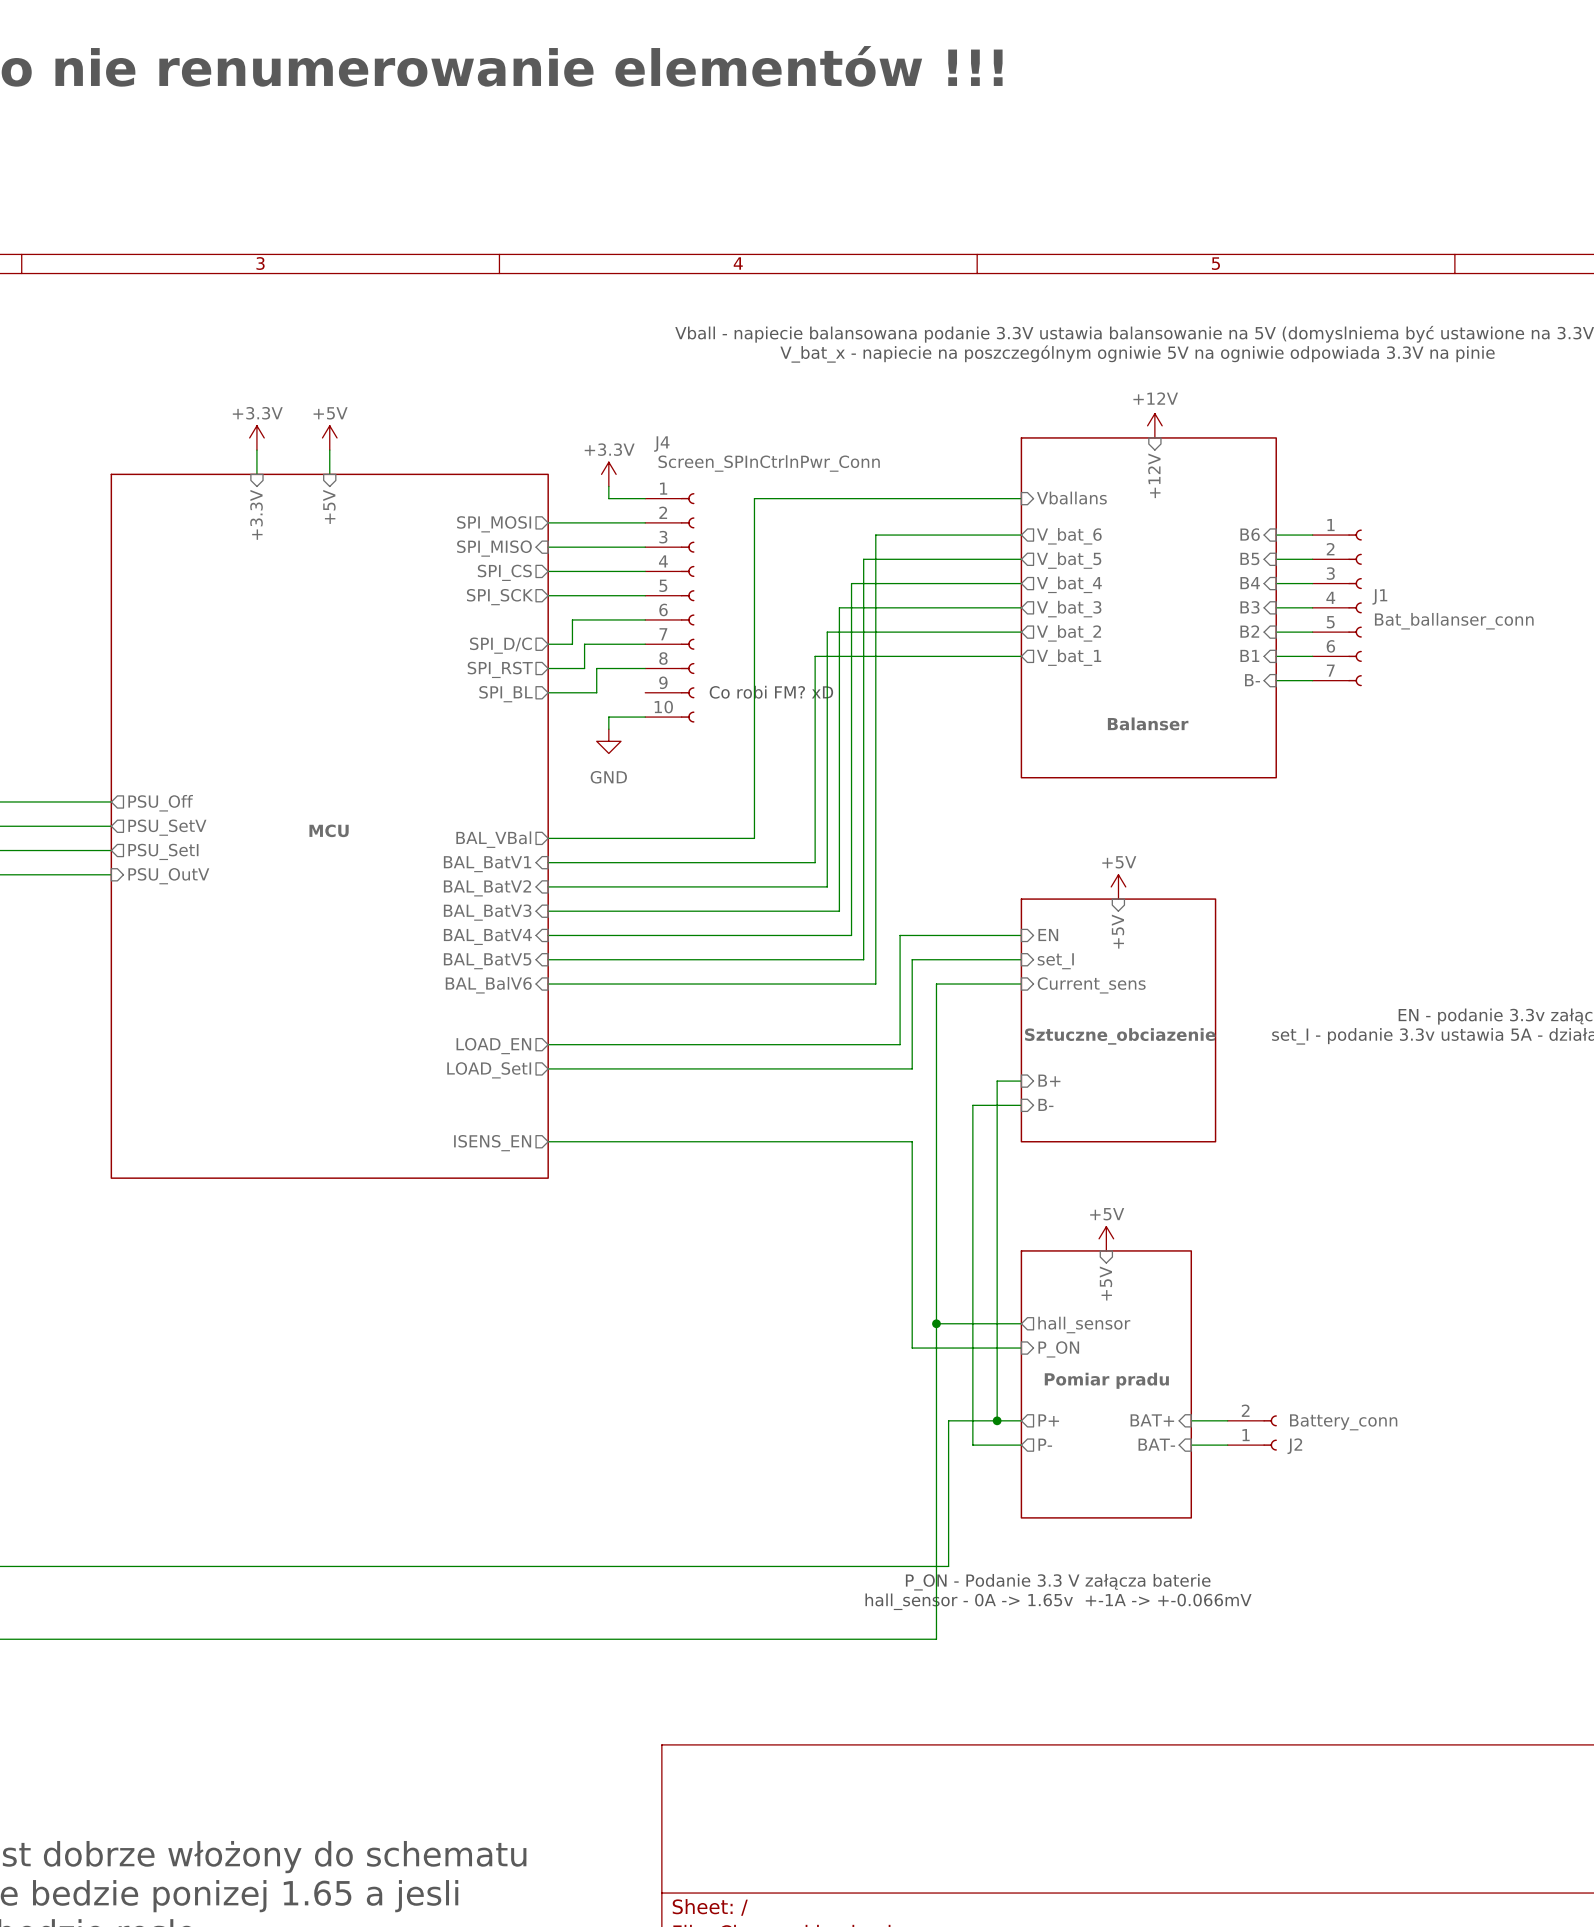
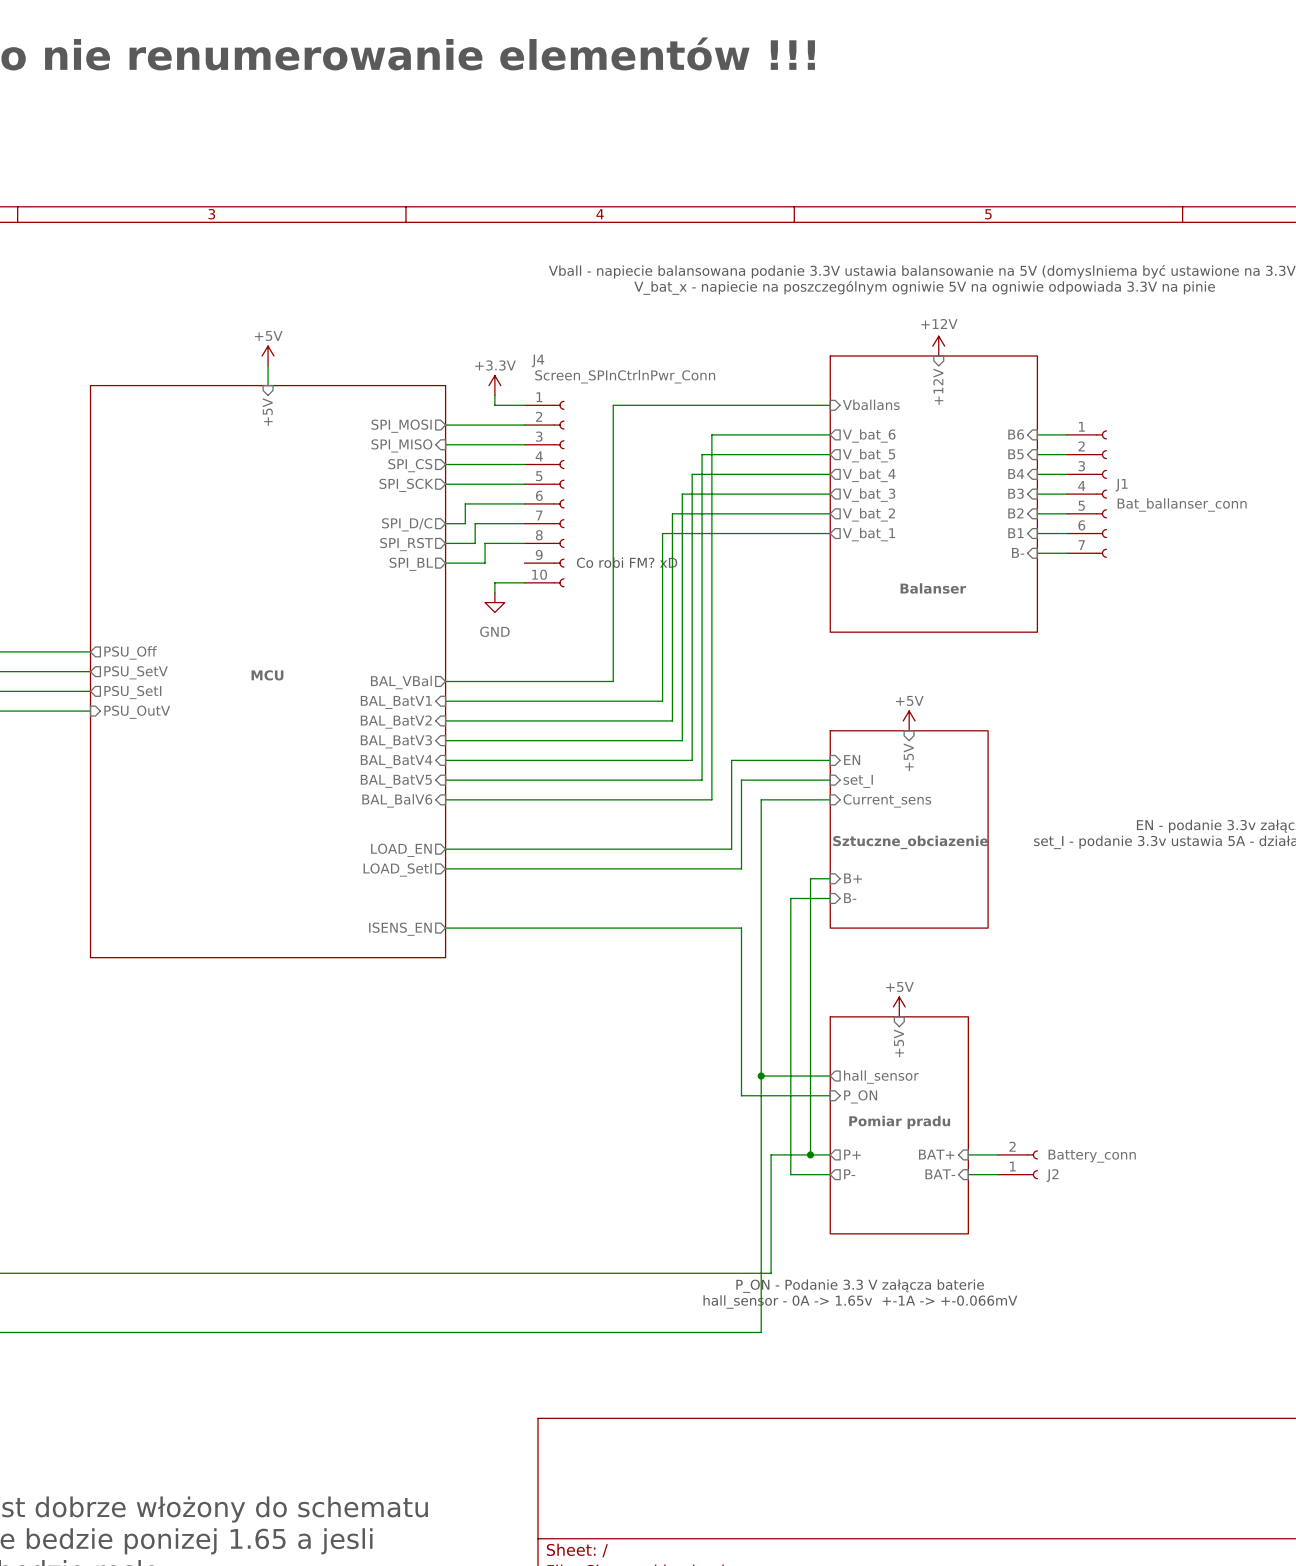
power symbol: +3.3V (256, 437) -> none
wire: (256, 450) (256, 474) -> none
sheet pin: +3.3V (256, 514) -> none

